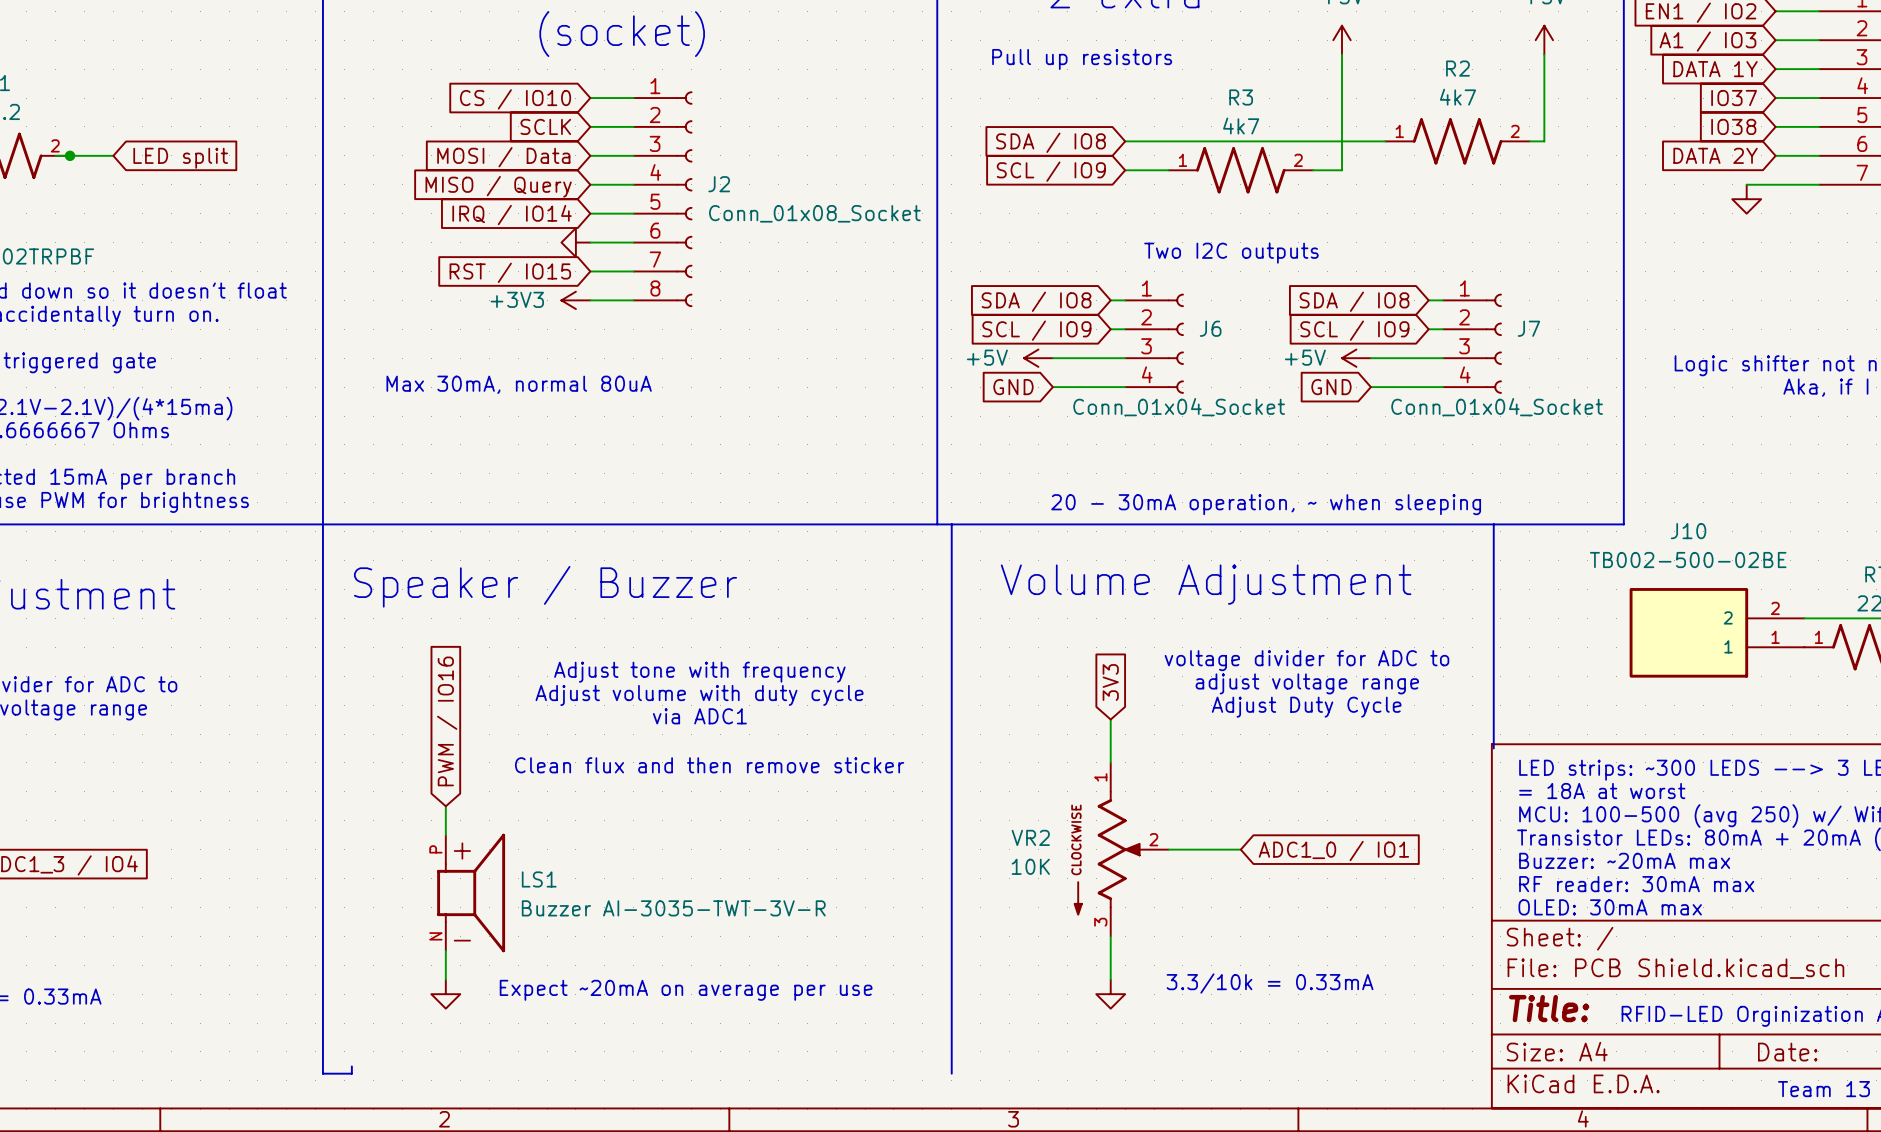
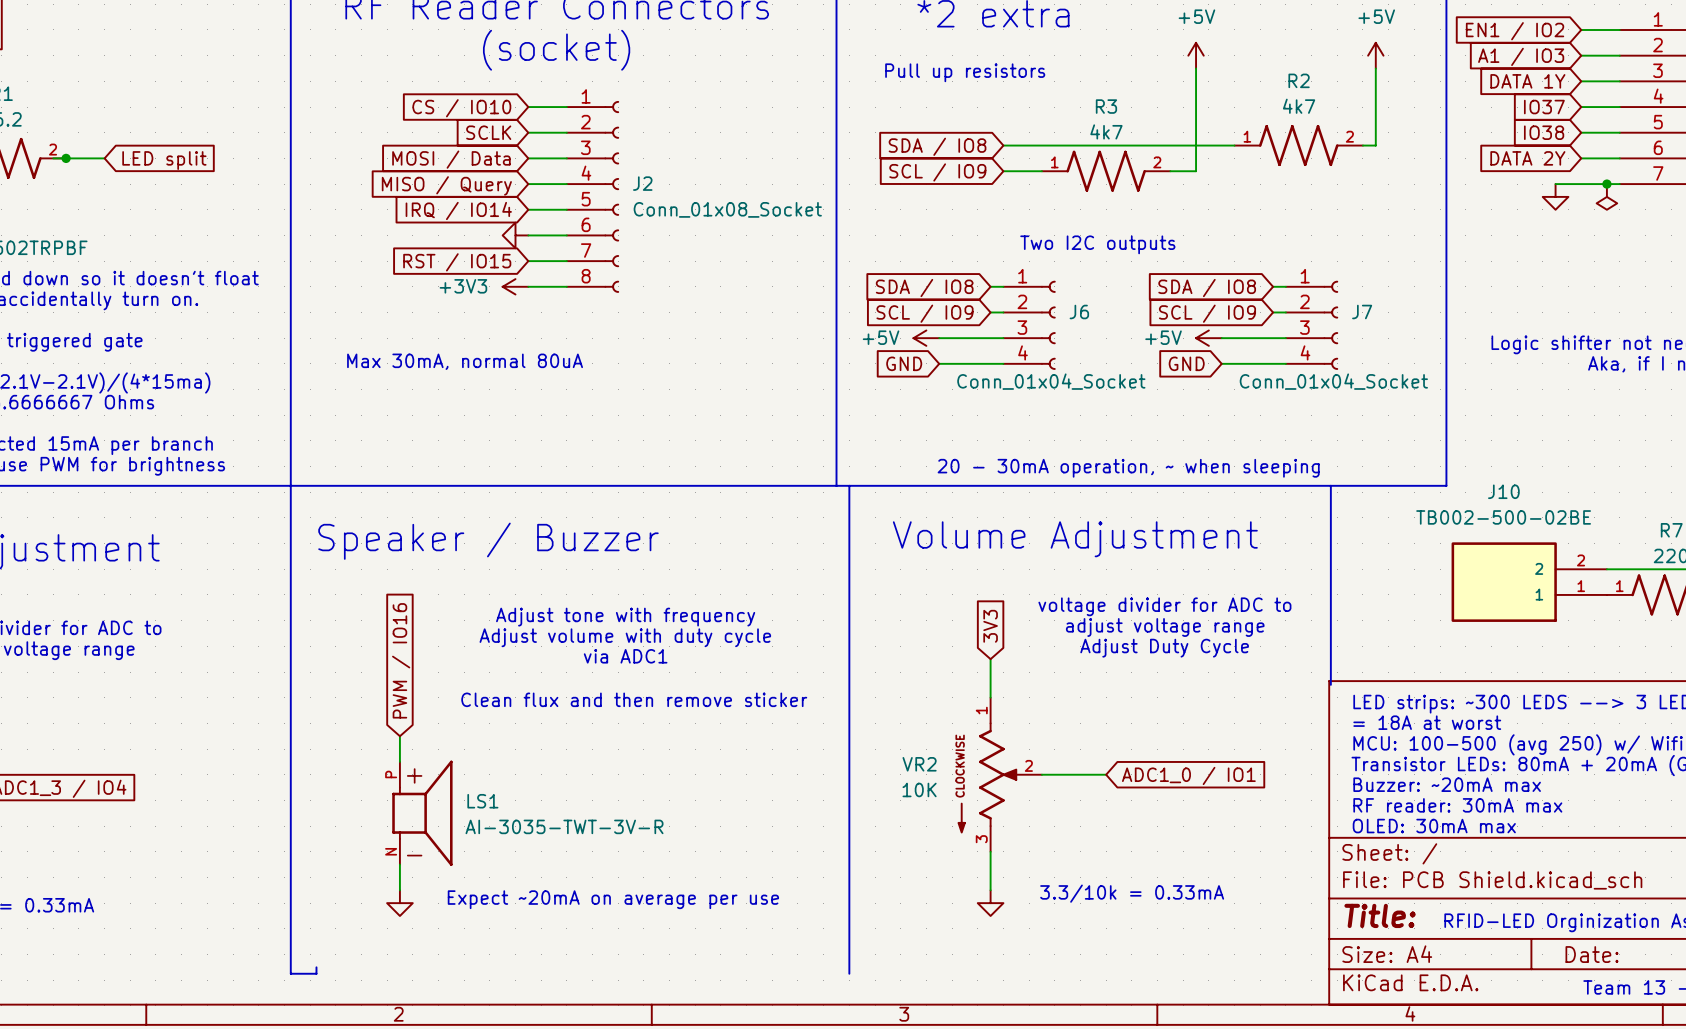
junction: none -> (1606, 184)
power symbol: none -> (1606, 196)
LS1 value: Buzzer AI-3035-TWT-3V-R (673, 908) -> AI-3035-TWT-3V-R (564, 826)

